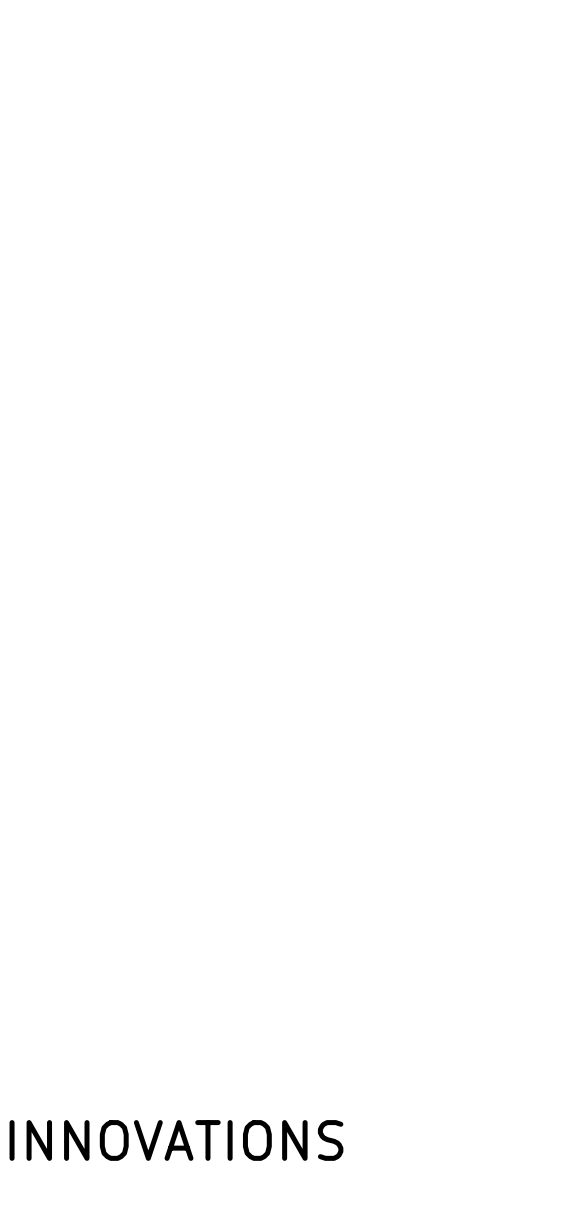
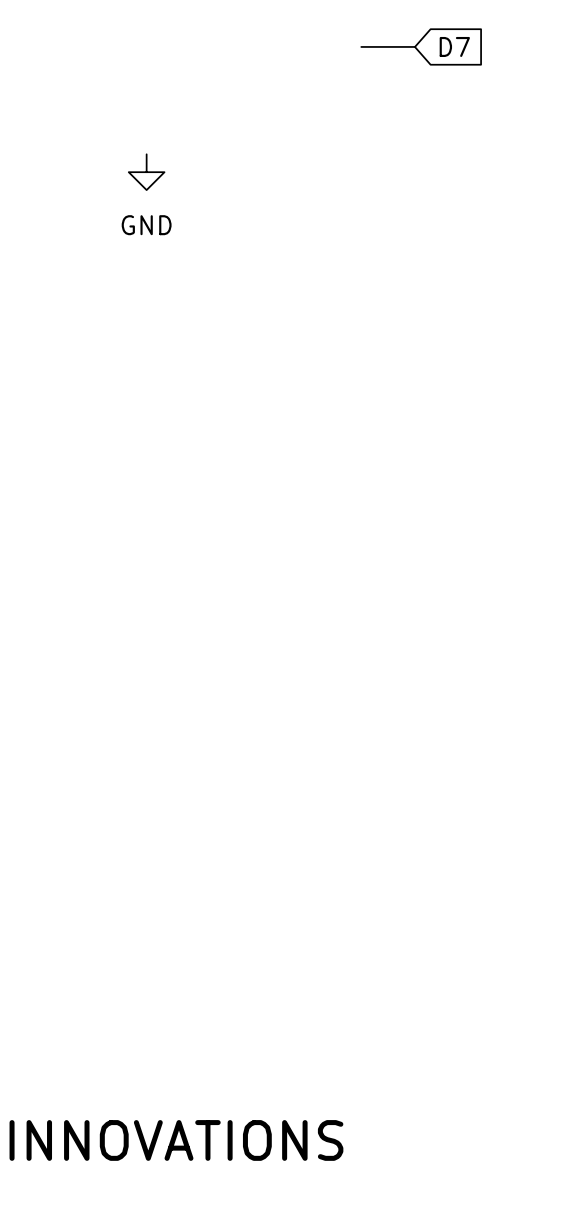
wire: none -> (361, 46) (414, 46)
global label: none -> D7 (454, 46)
power symbol: none -> GND (146, 172)

